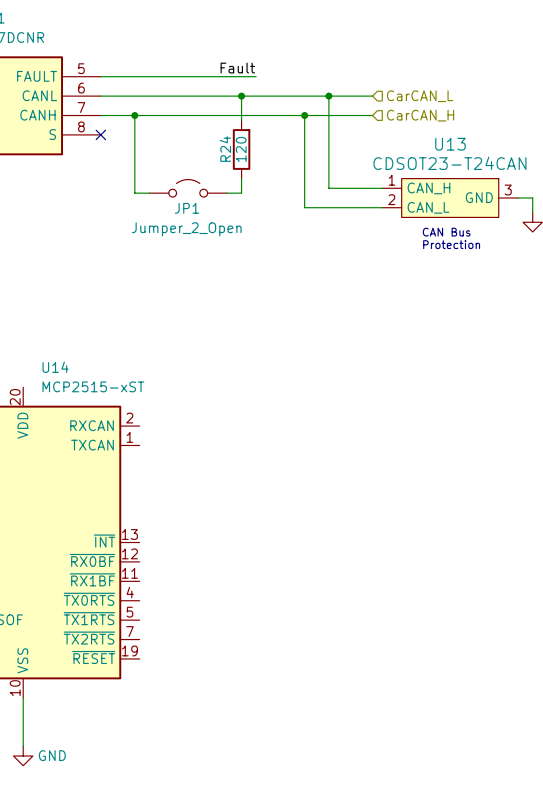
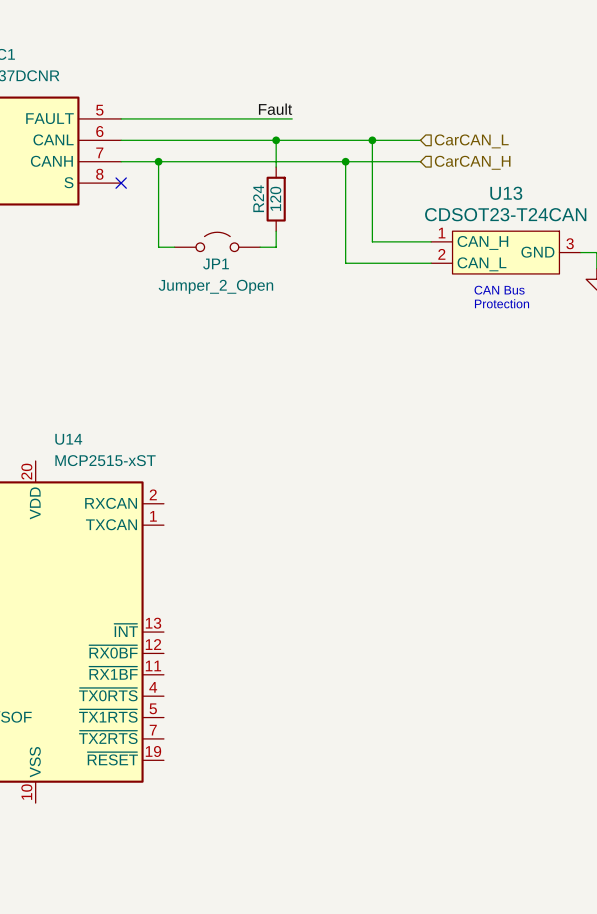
wire: (23, 697) (23, 746) -> none
power symbol: GND (23, 756) -> none

